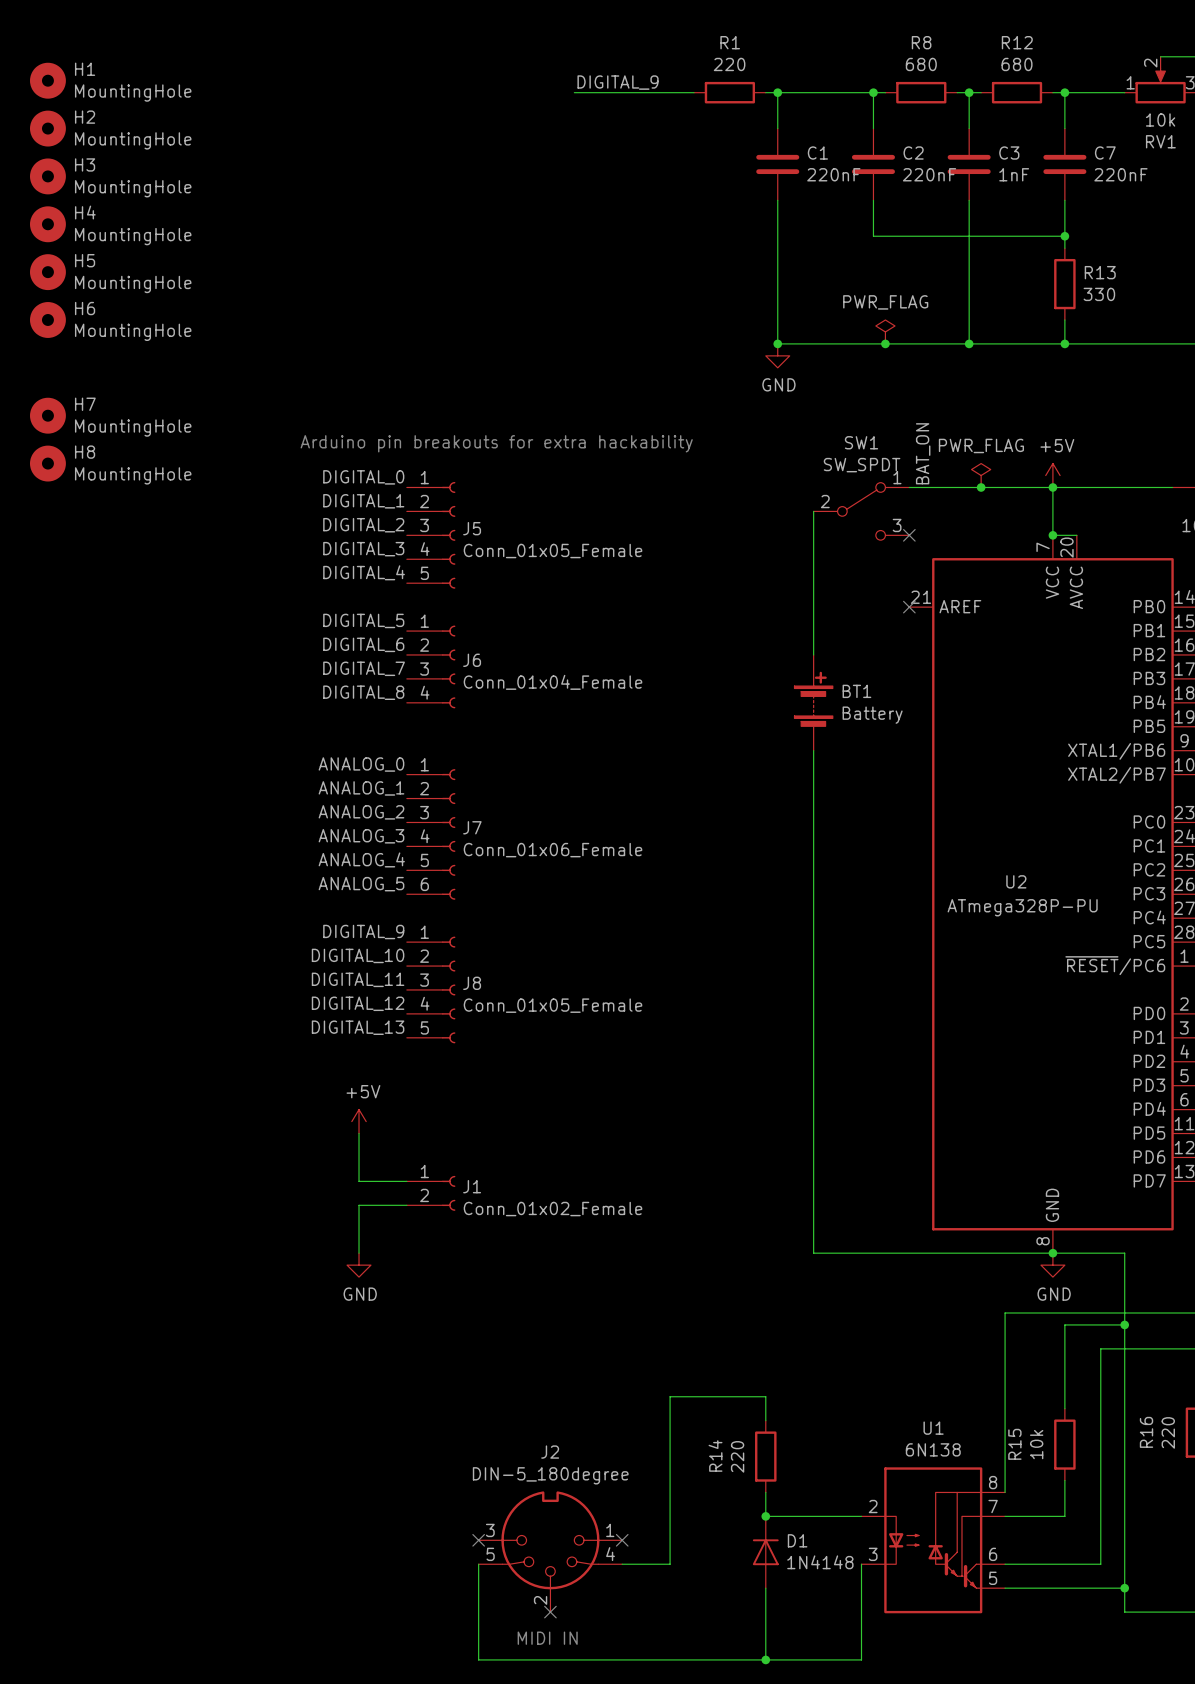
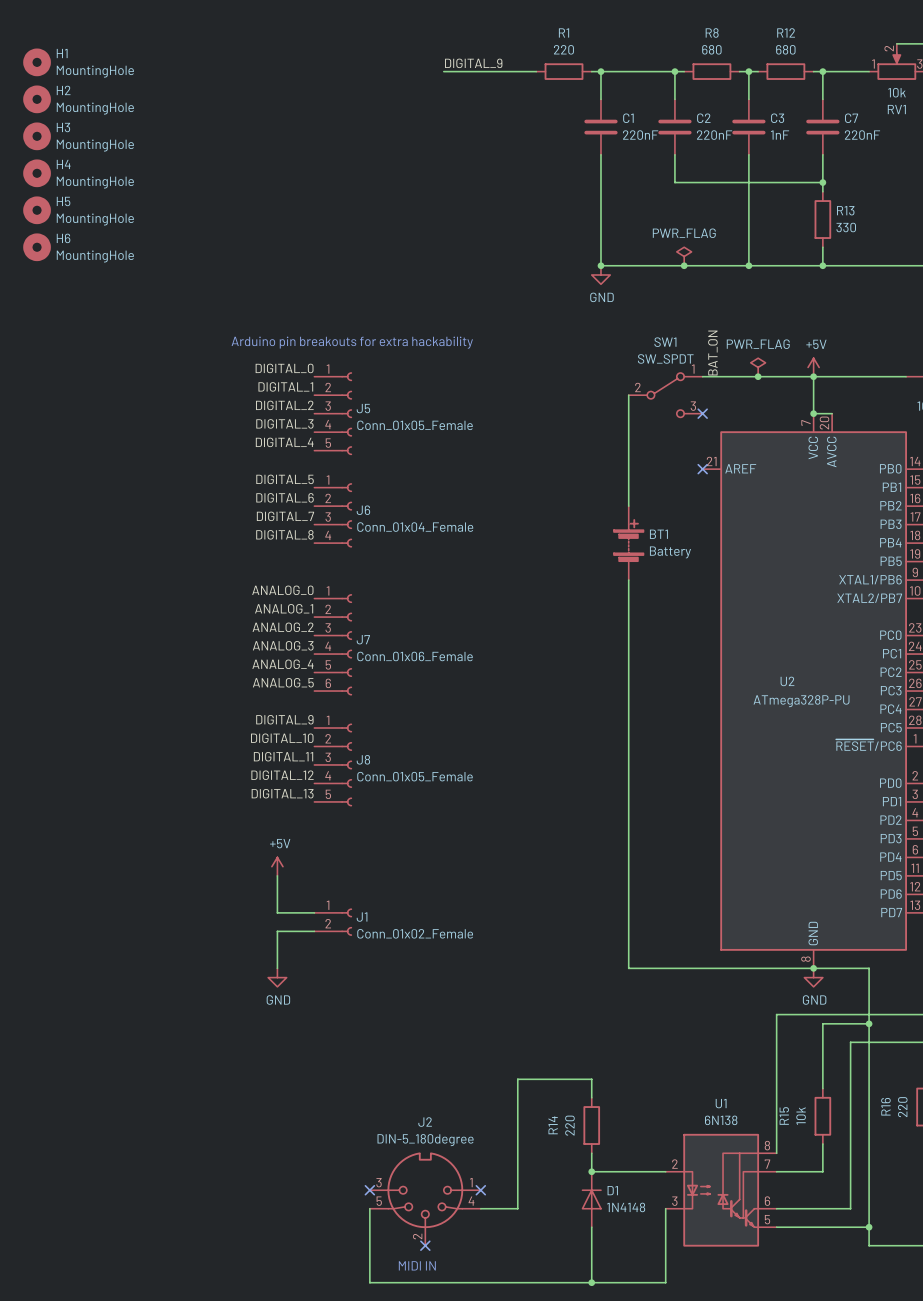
H7: MountingHole (47, 415) -> none
H8: MountingHole (47, 463) -> none

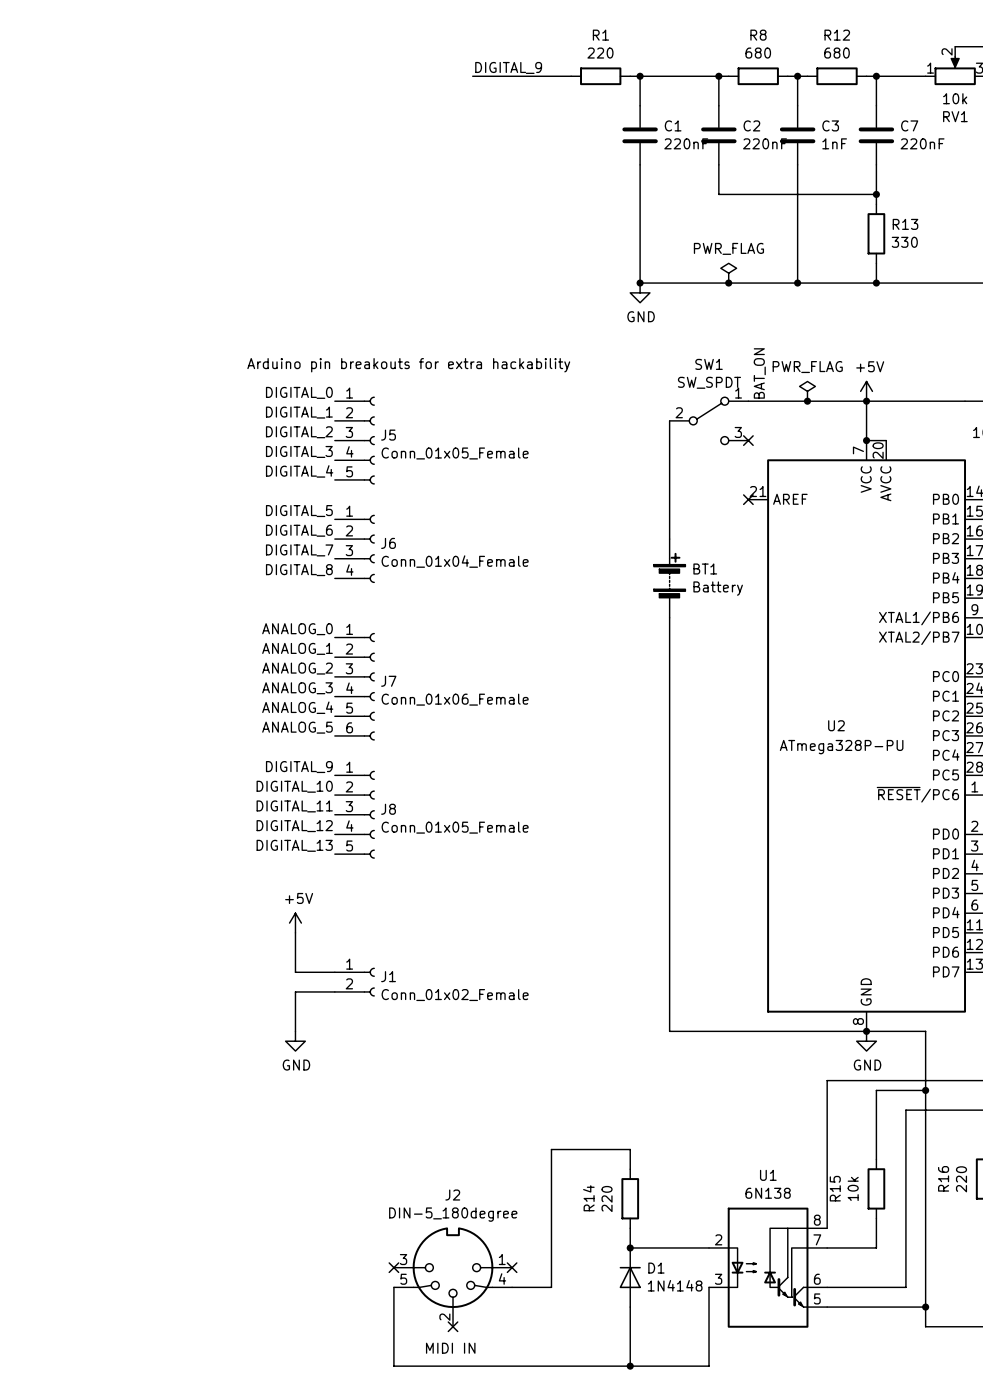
H1: MountingHole (37, 62) -> none
H2: MountingHole (37, 99) -> none
H3: MountingHole (37, 136) -> none
H4: MountingHole (37, 173) -> none
H5: MountingHole (37, 210) -> none
H6: MountingHole (37, 247) -> none

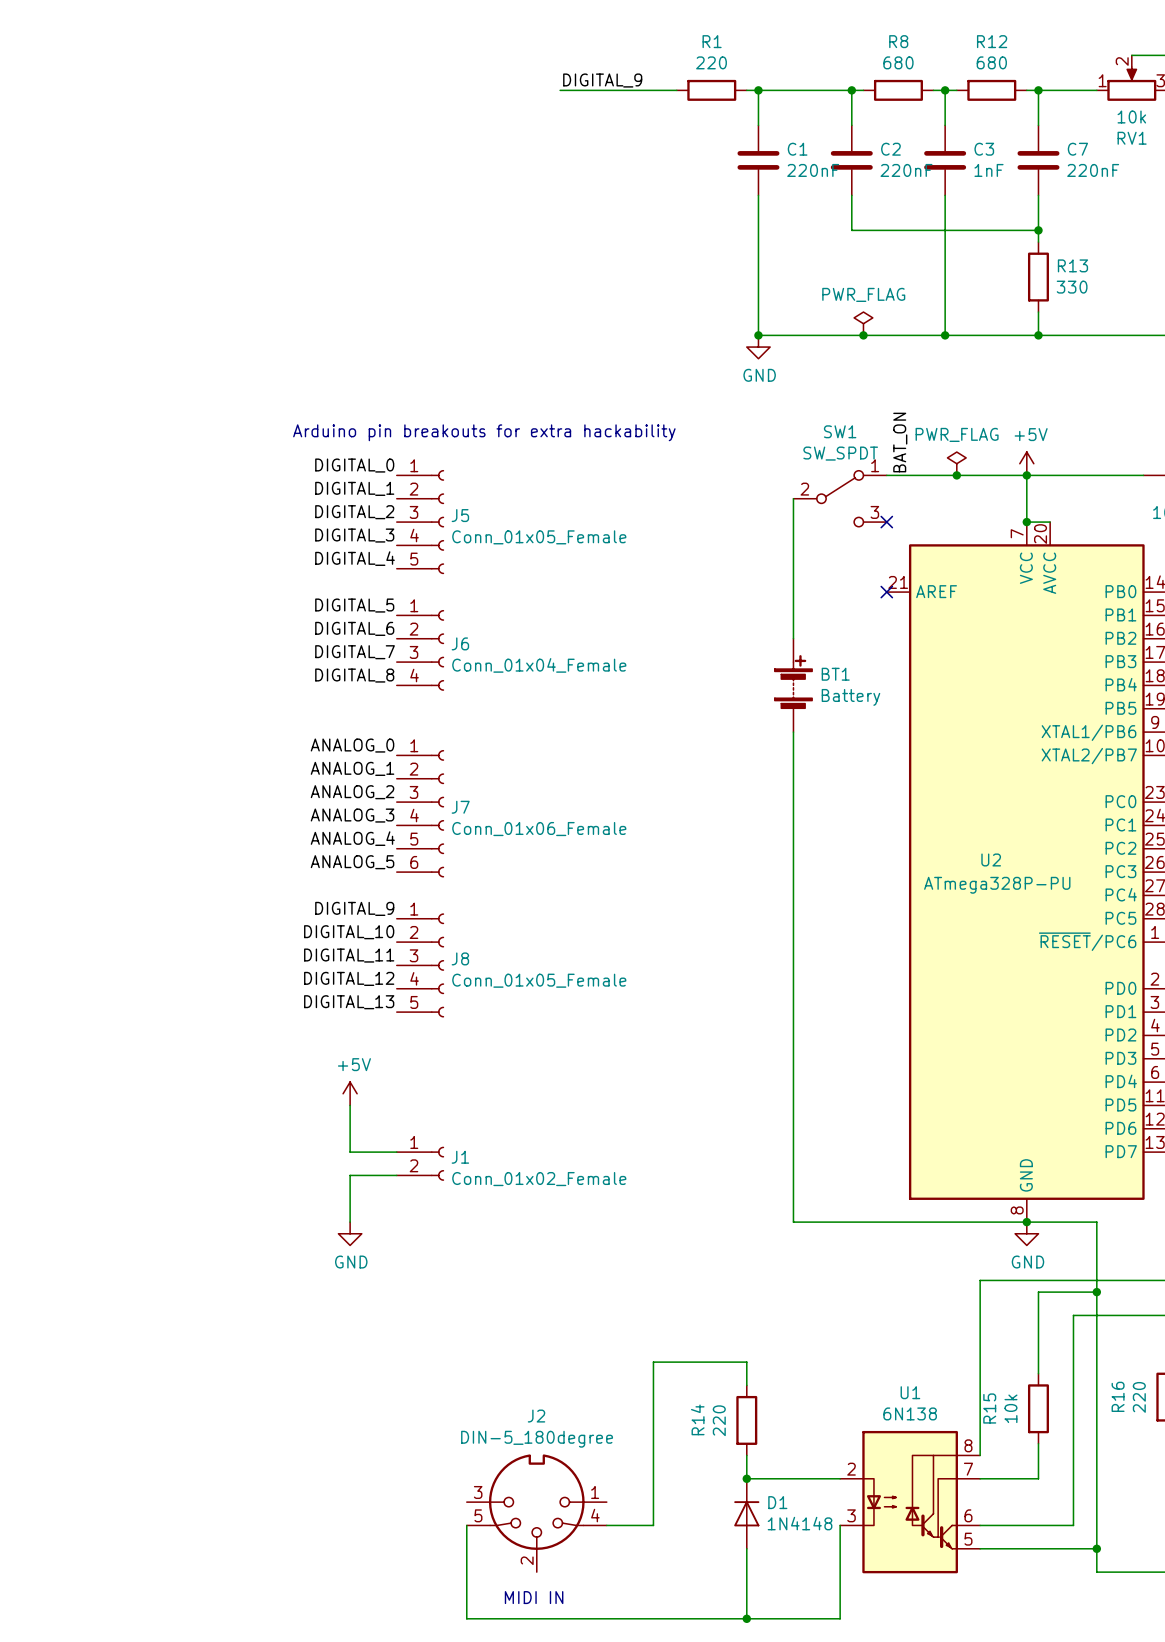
no-connect mark: (393, 1267) -> none
no-connect mark: (512, 1267) -> none
no-connect mark: (453, 1326) -> none

